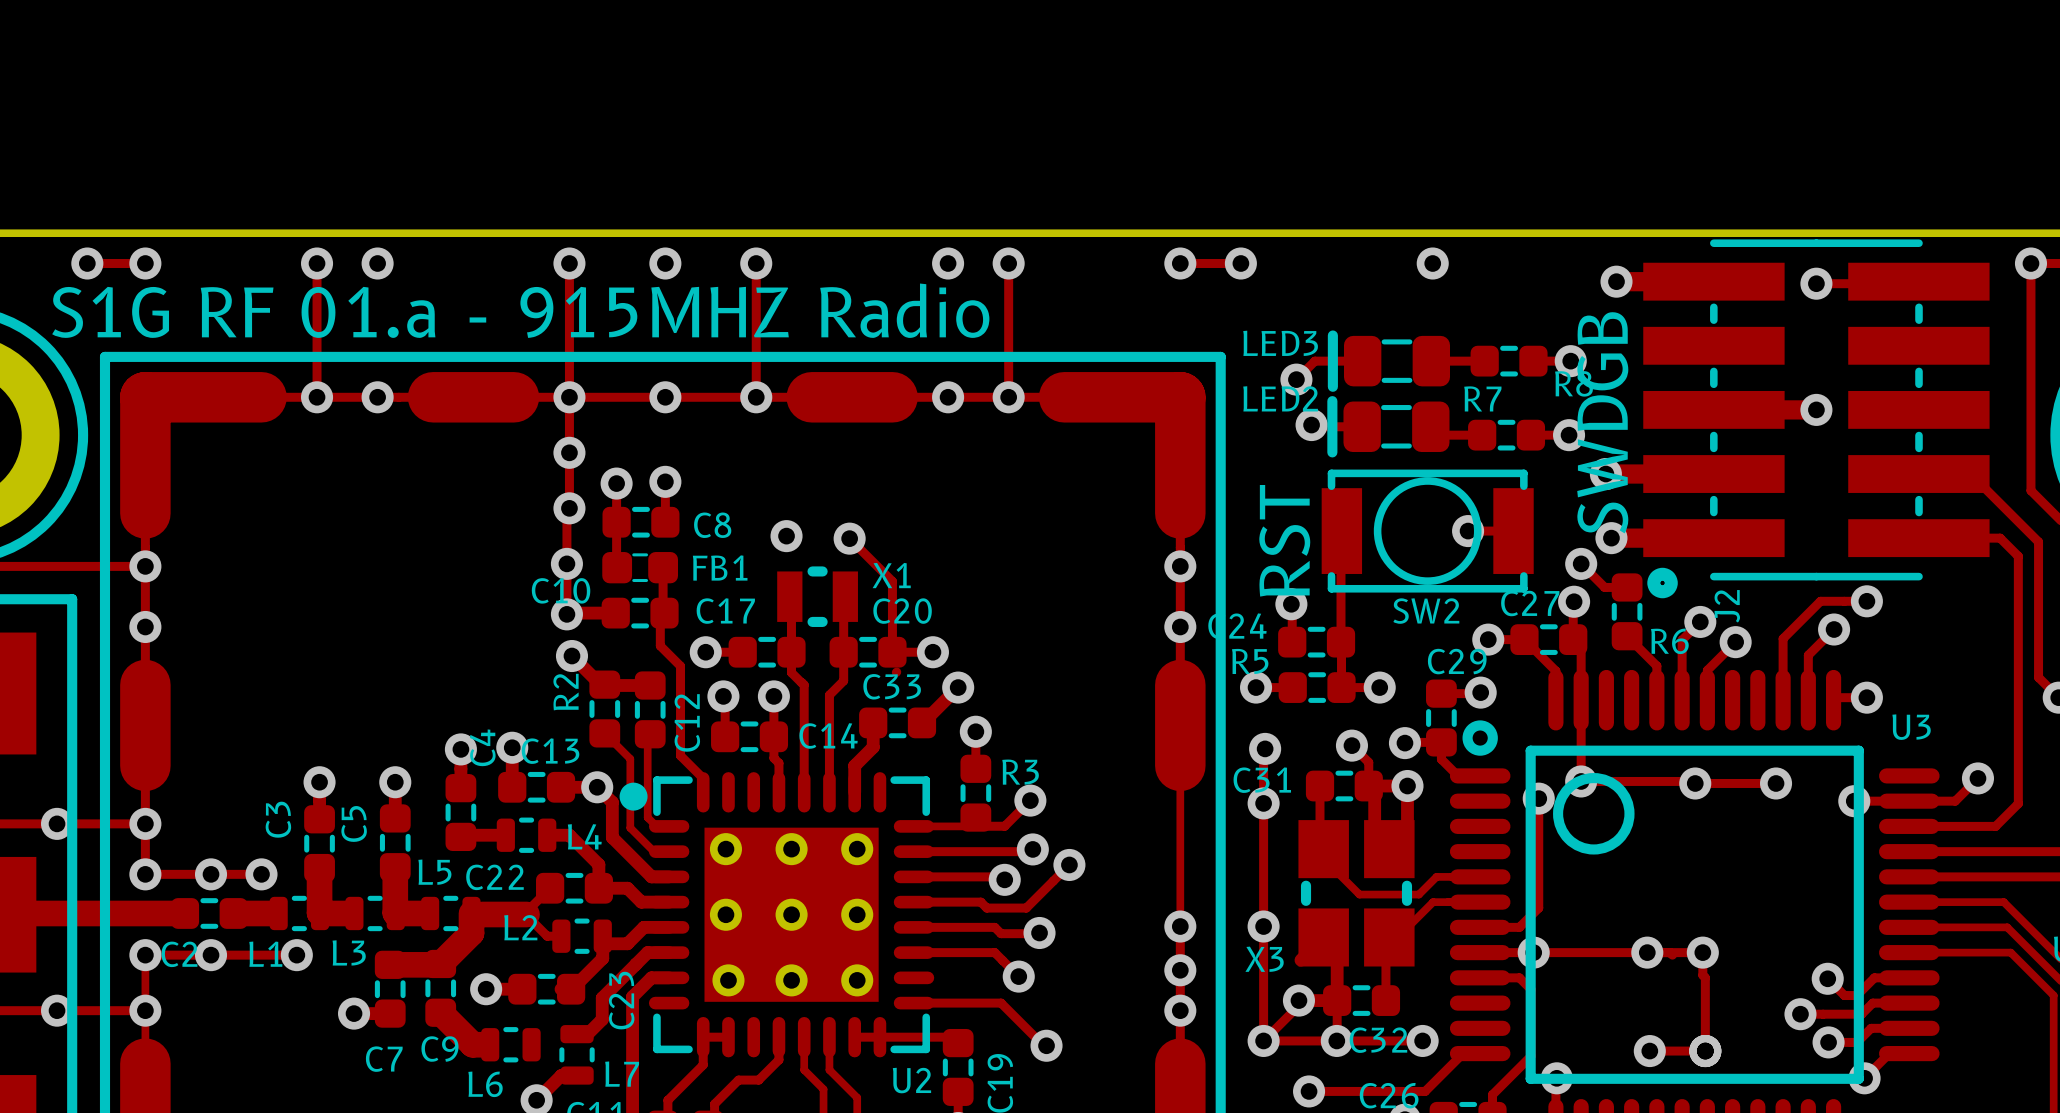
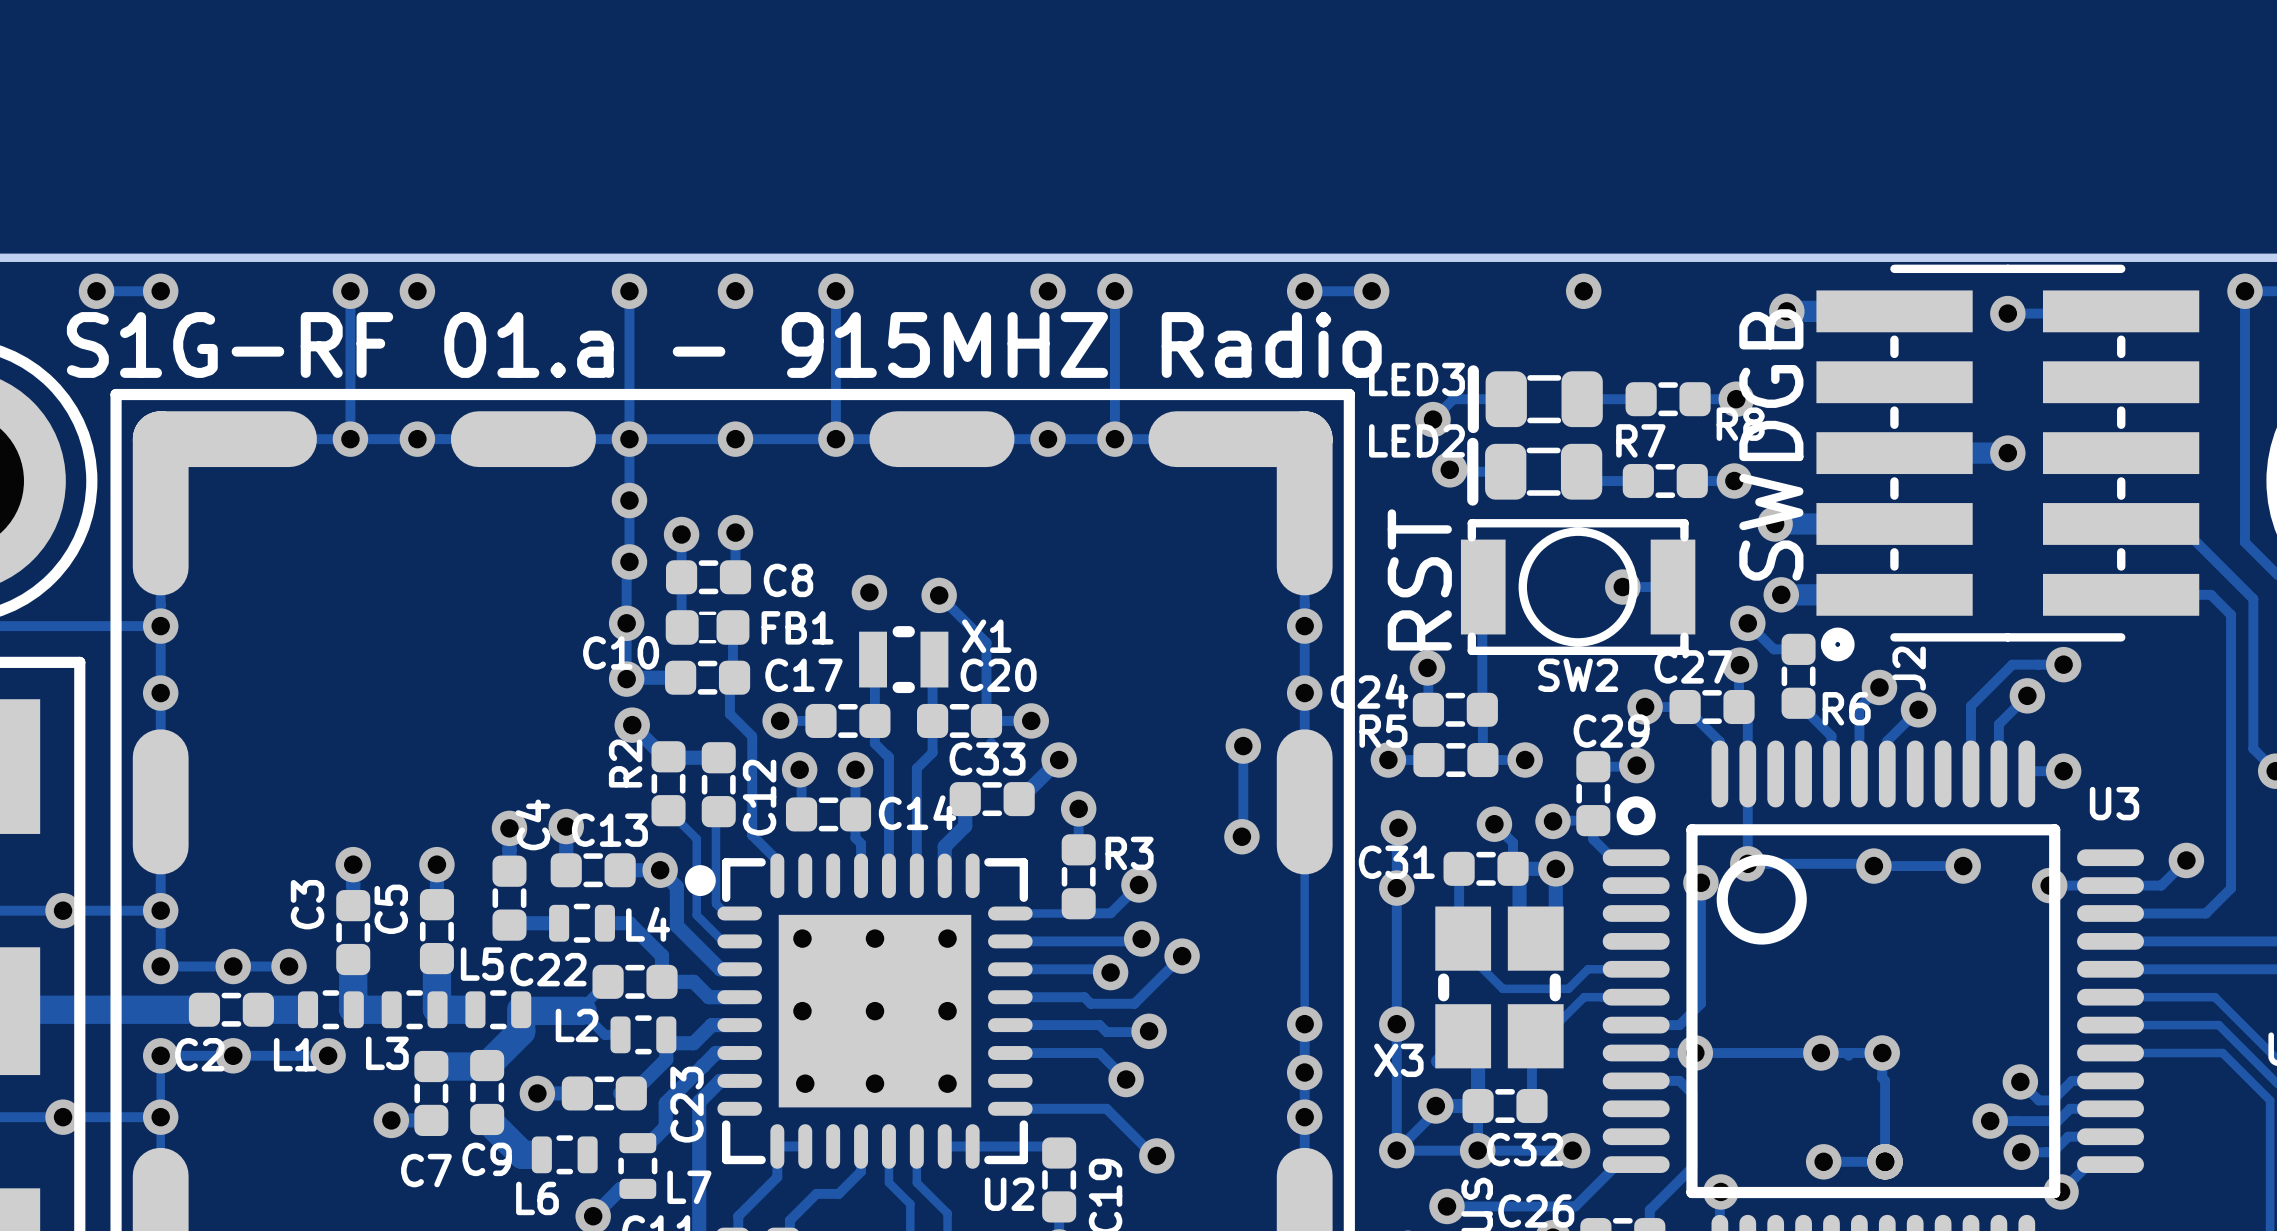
text: S1G RF 01.a - 915MHZ Radio (520, 310) -> S1G-RF 01.a - 915MHZ Radio (724, 344)
track: none -> (1243, 746) (1241, 836)
via: none -> (1243, 746)
via: none -> (1241, 836)

